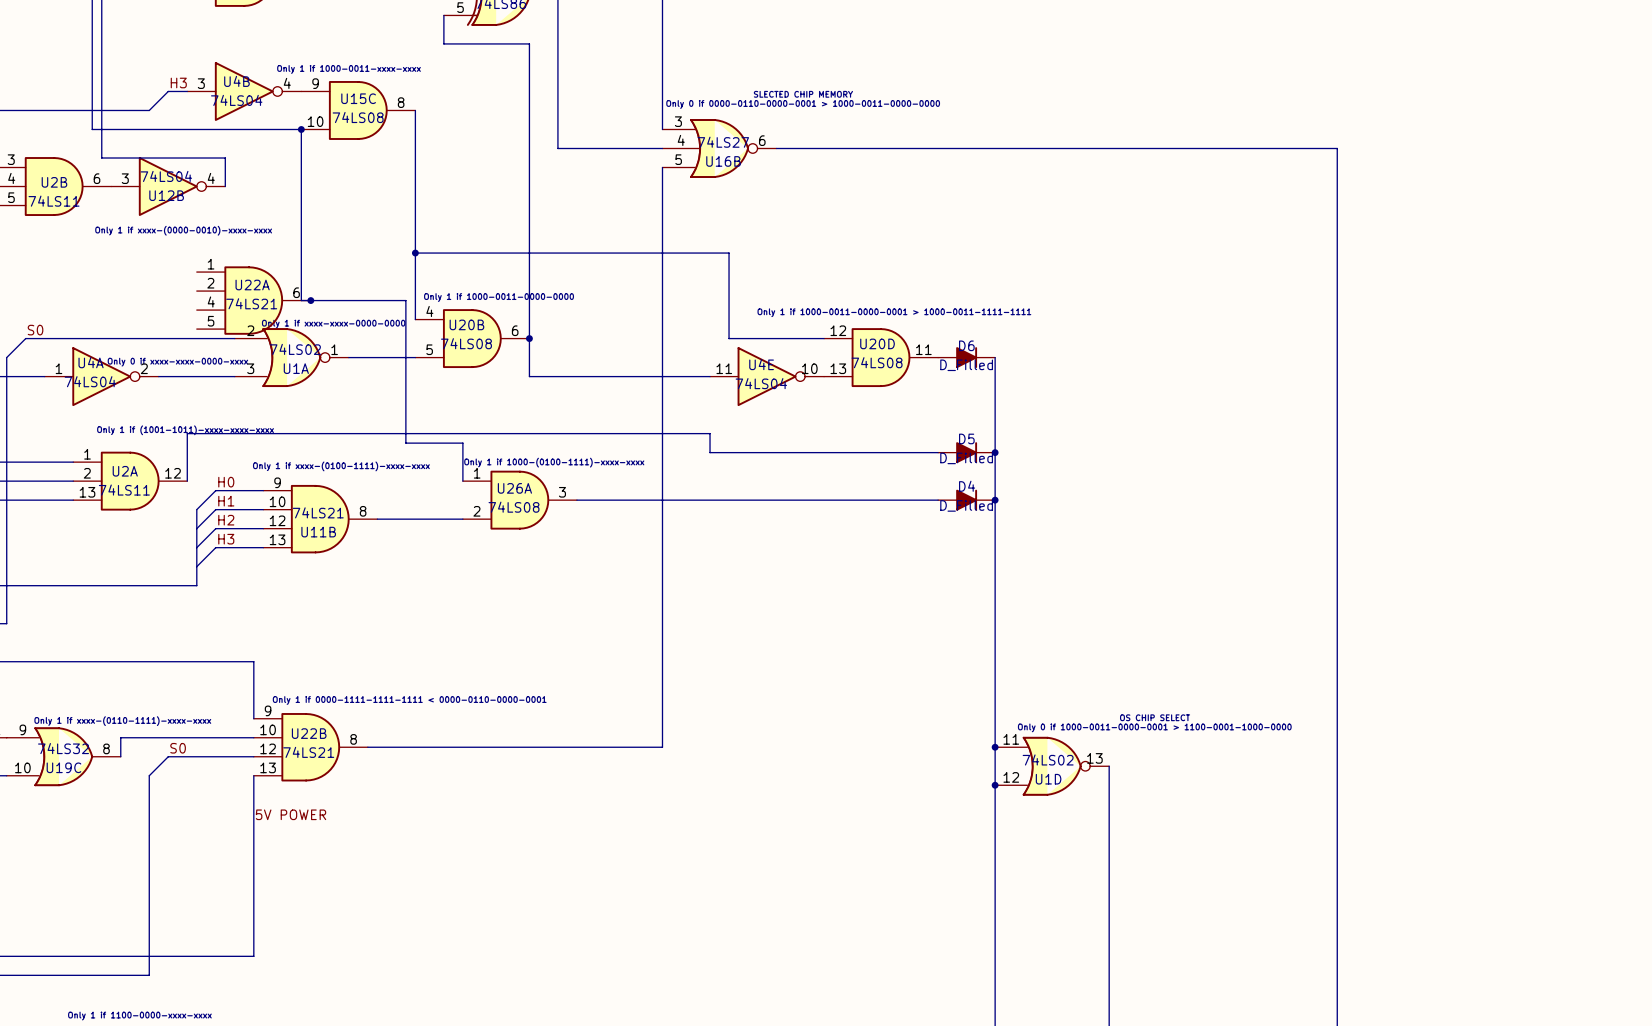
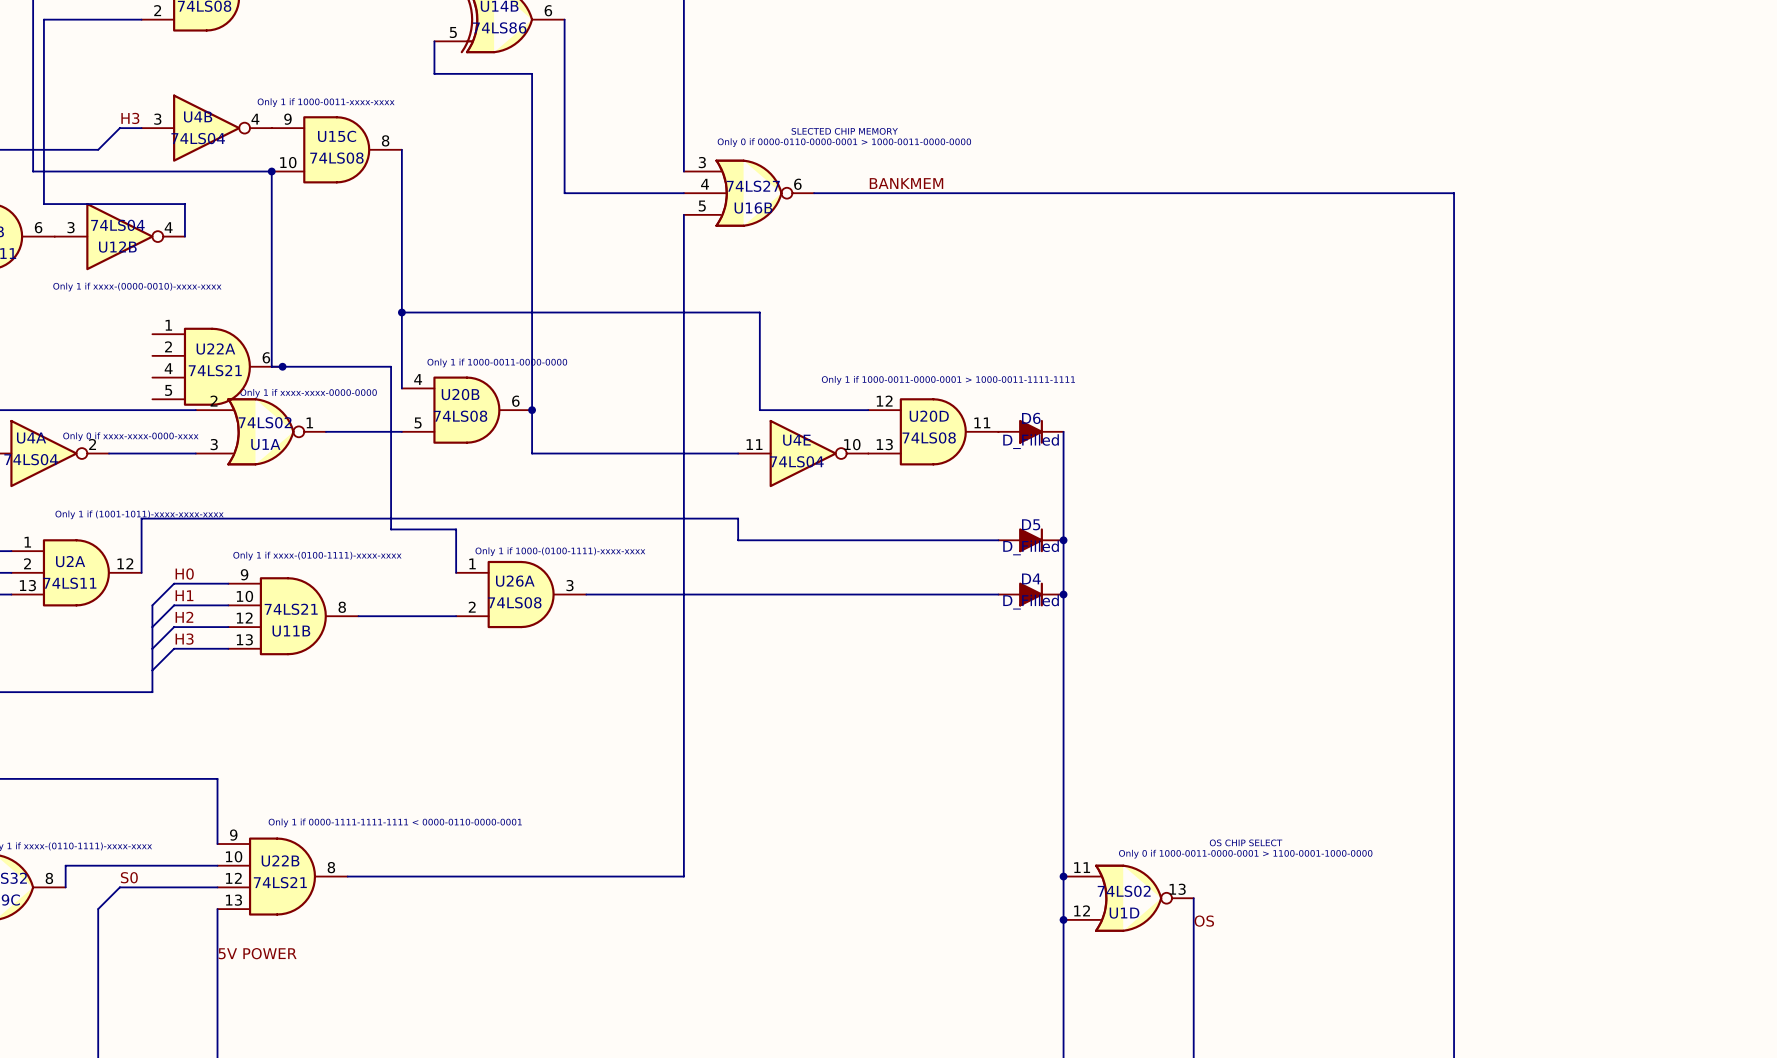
label: none -> BANKMEM (906, 183)
label: none -> OS (1204, 921)

